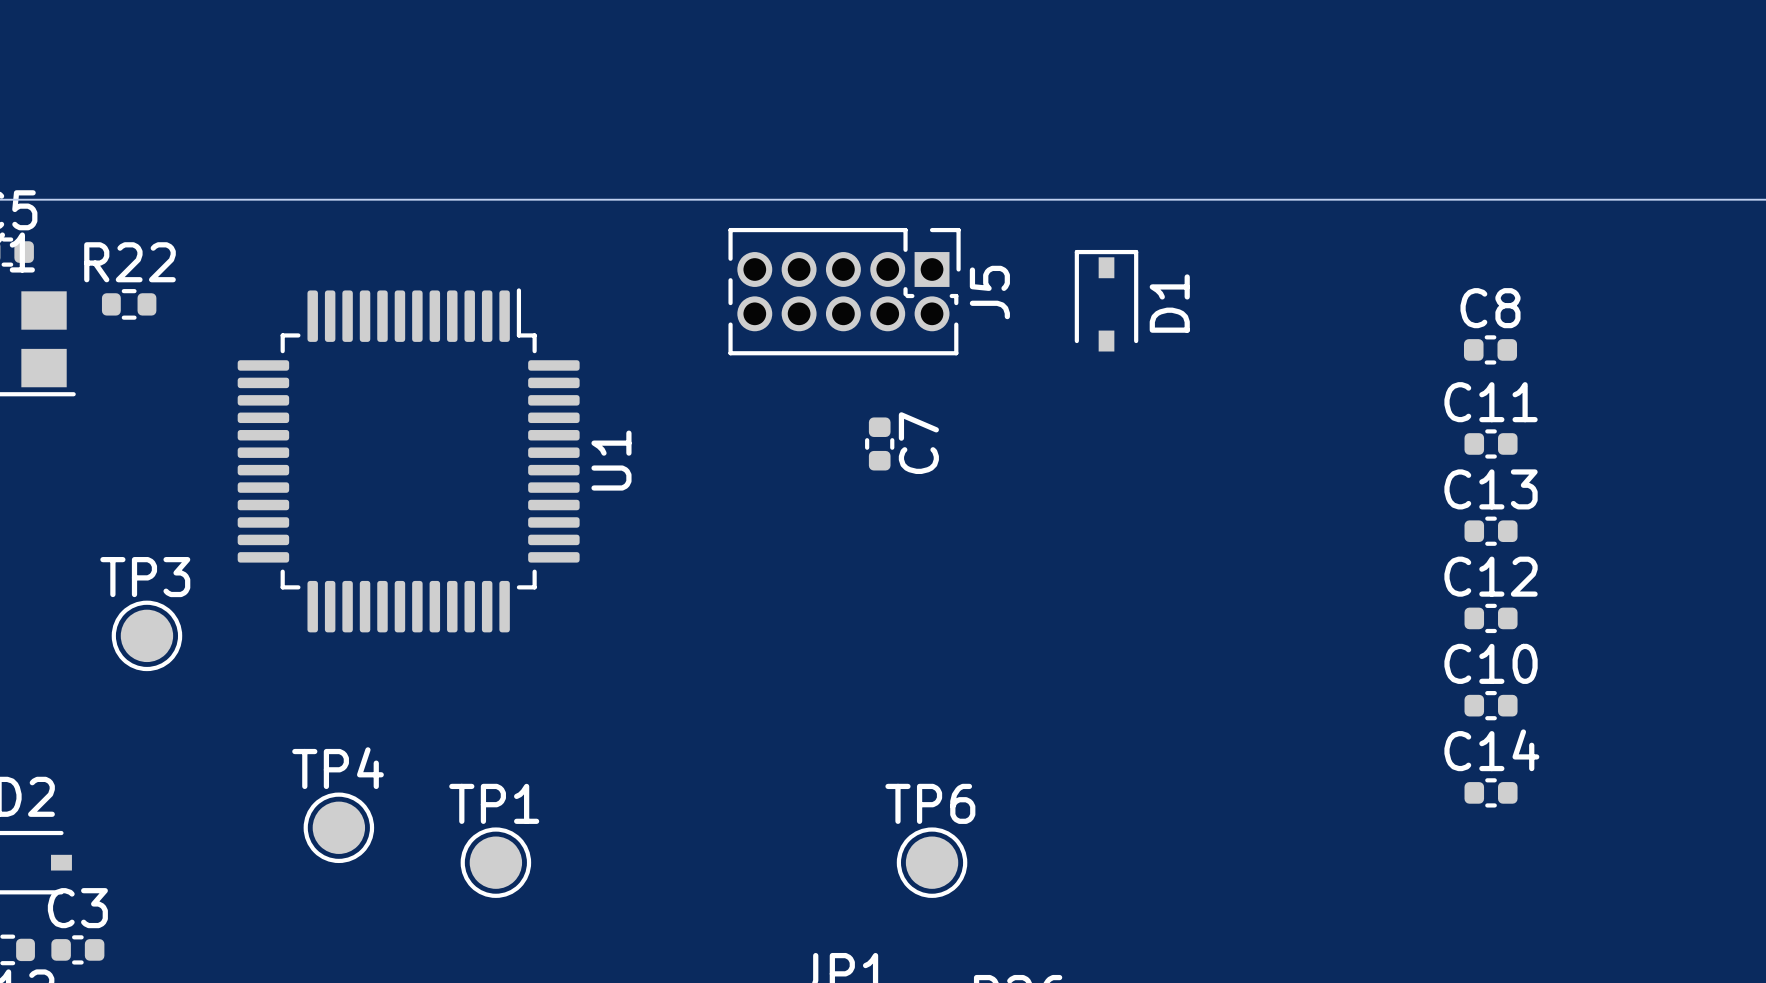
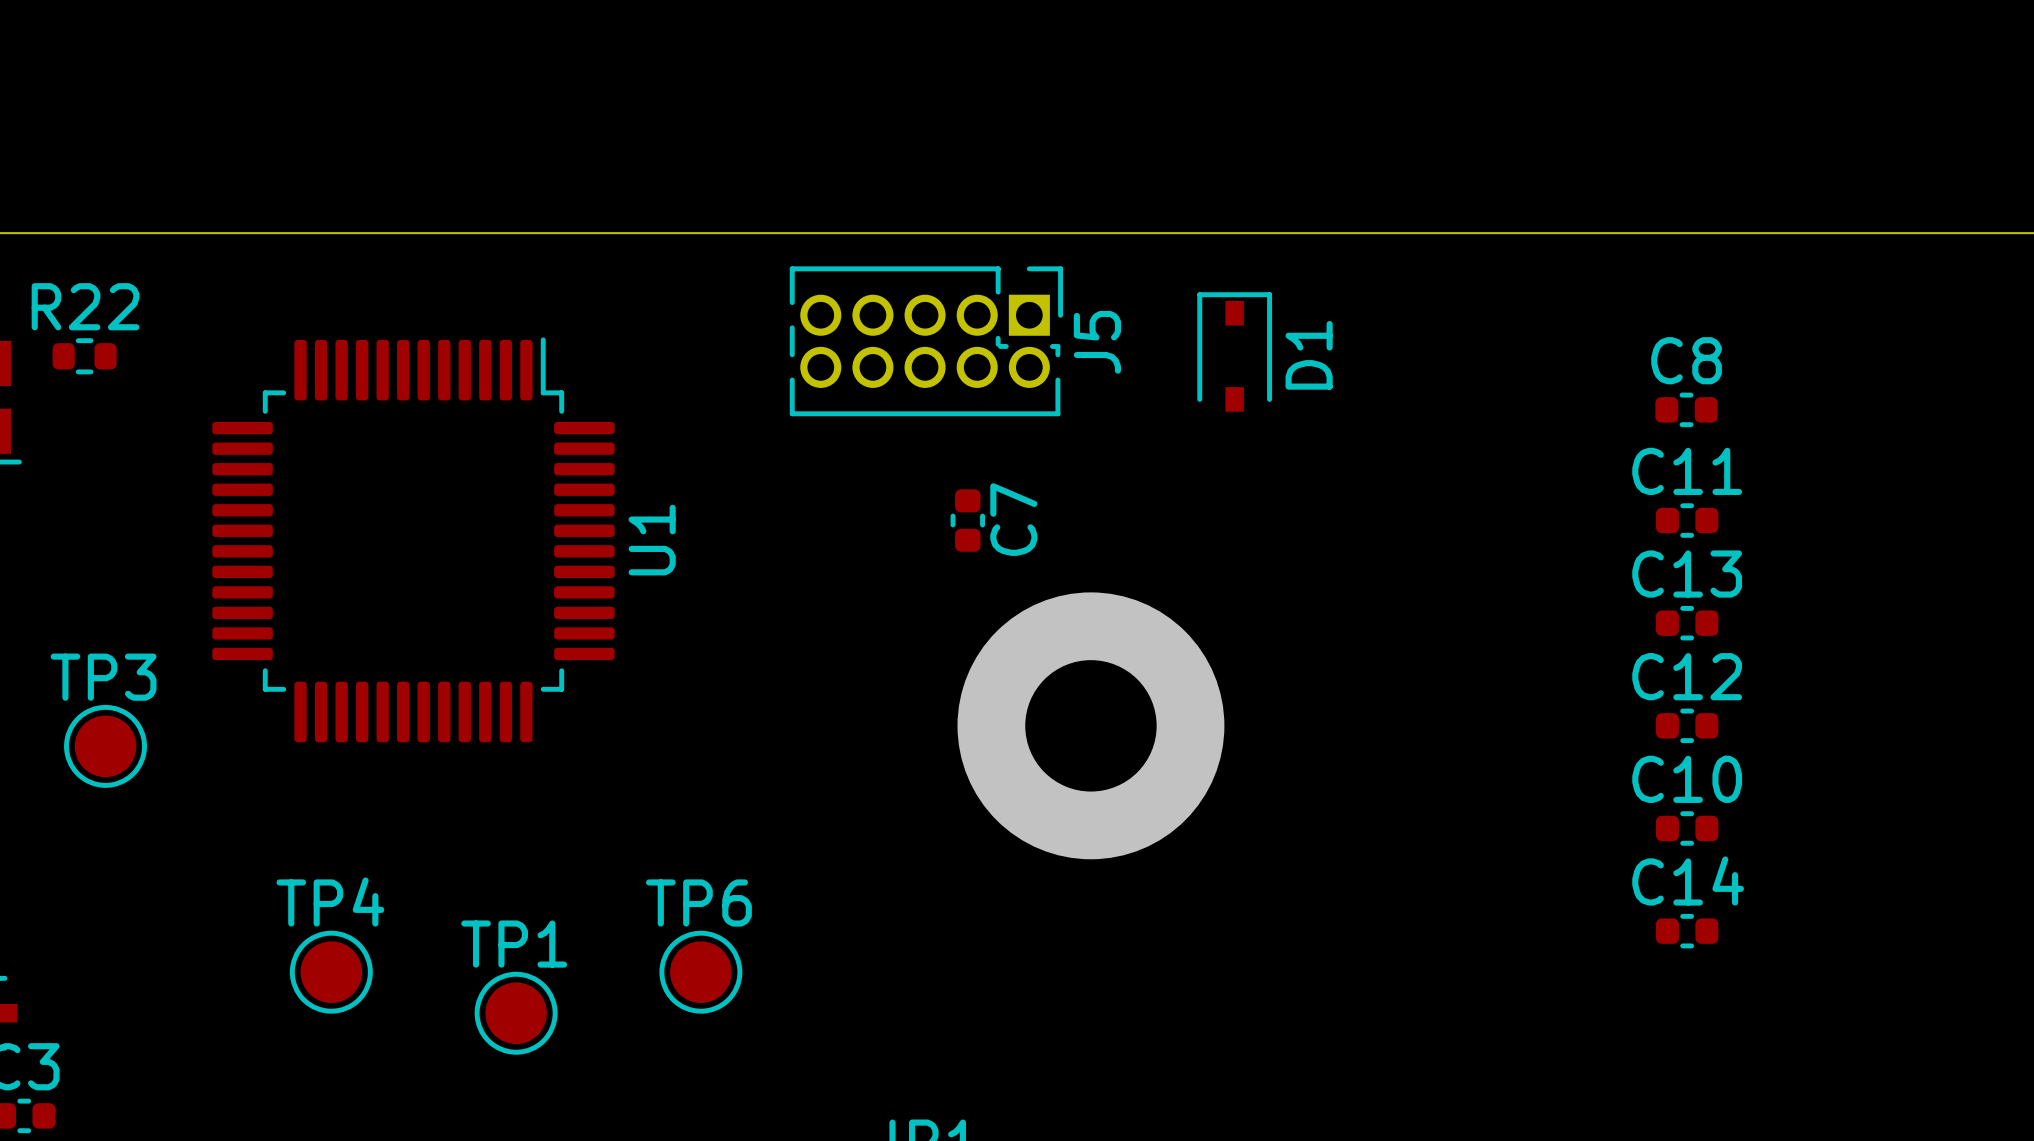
via: none -> (1090, 725)
TP6 position: (932, 862) -> (700, 972)

